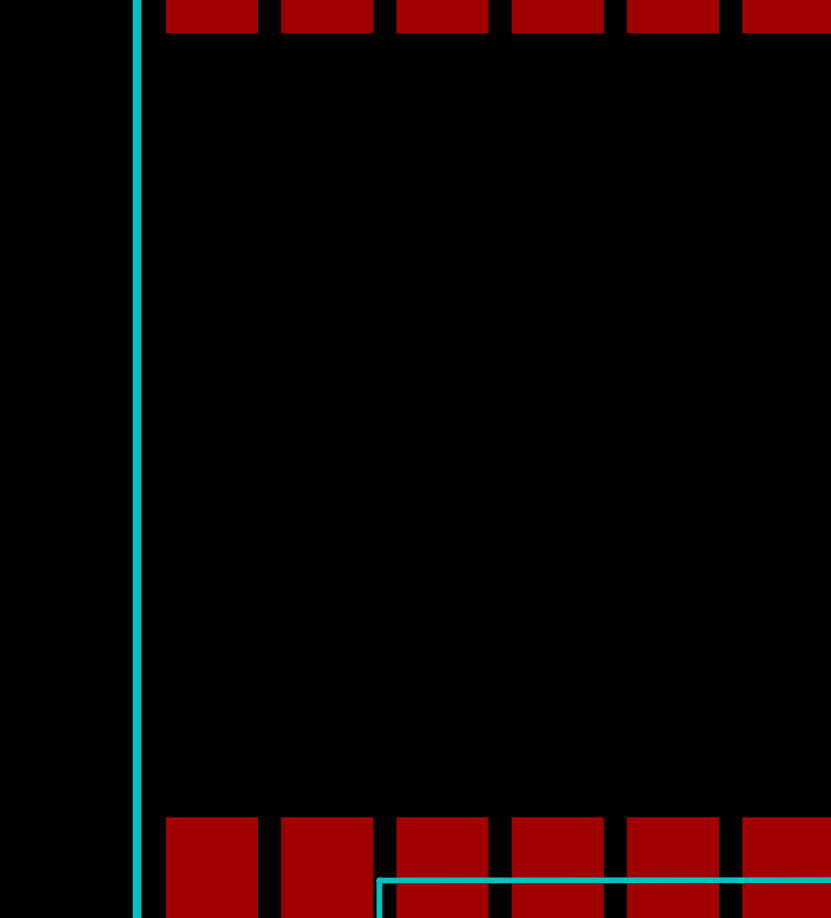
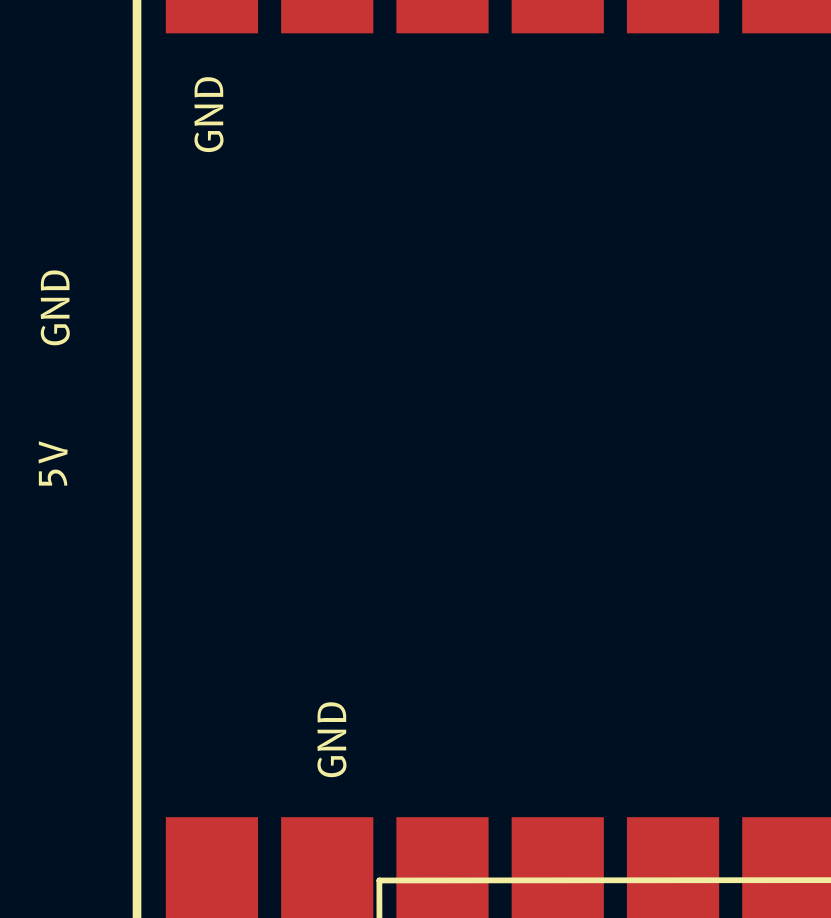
text: none -> GND (208, 114)
text: none -> GND (55, 307)
text: none -> 5V (53, 463)
text: none -> GND (331, 739)

